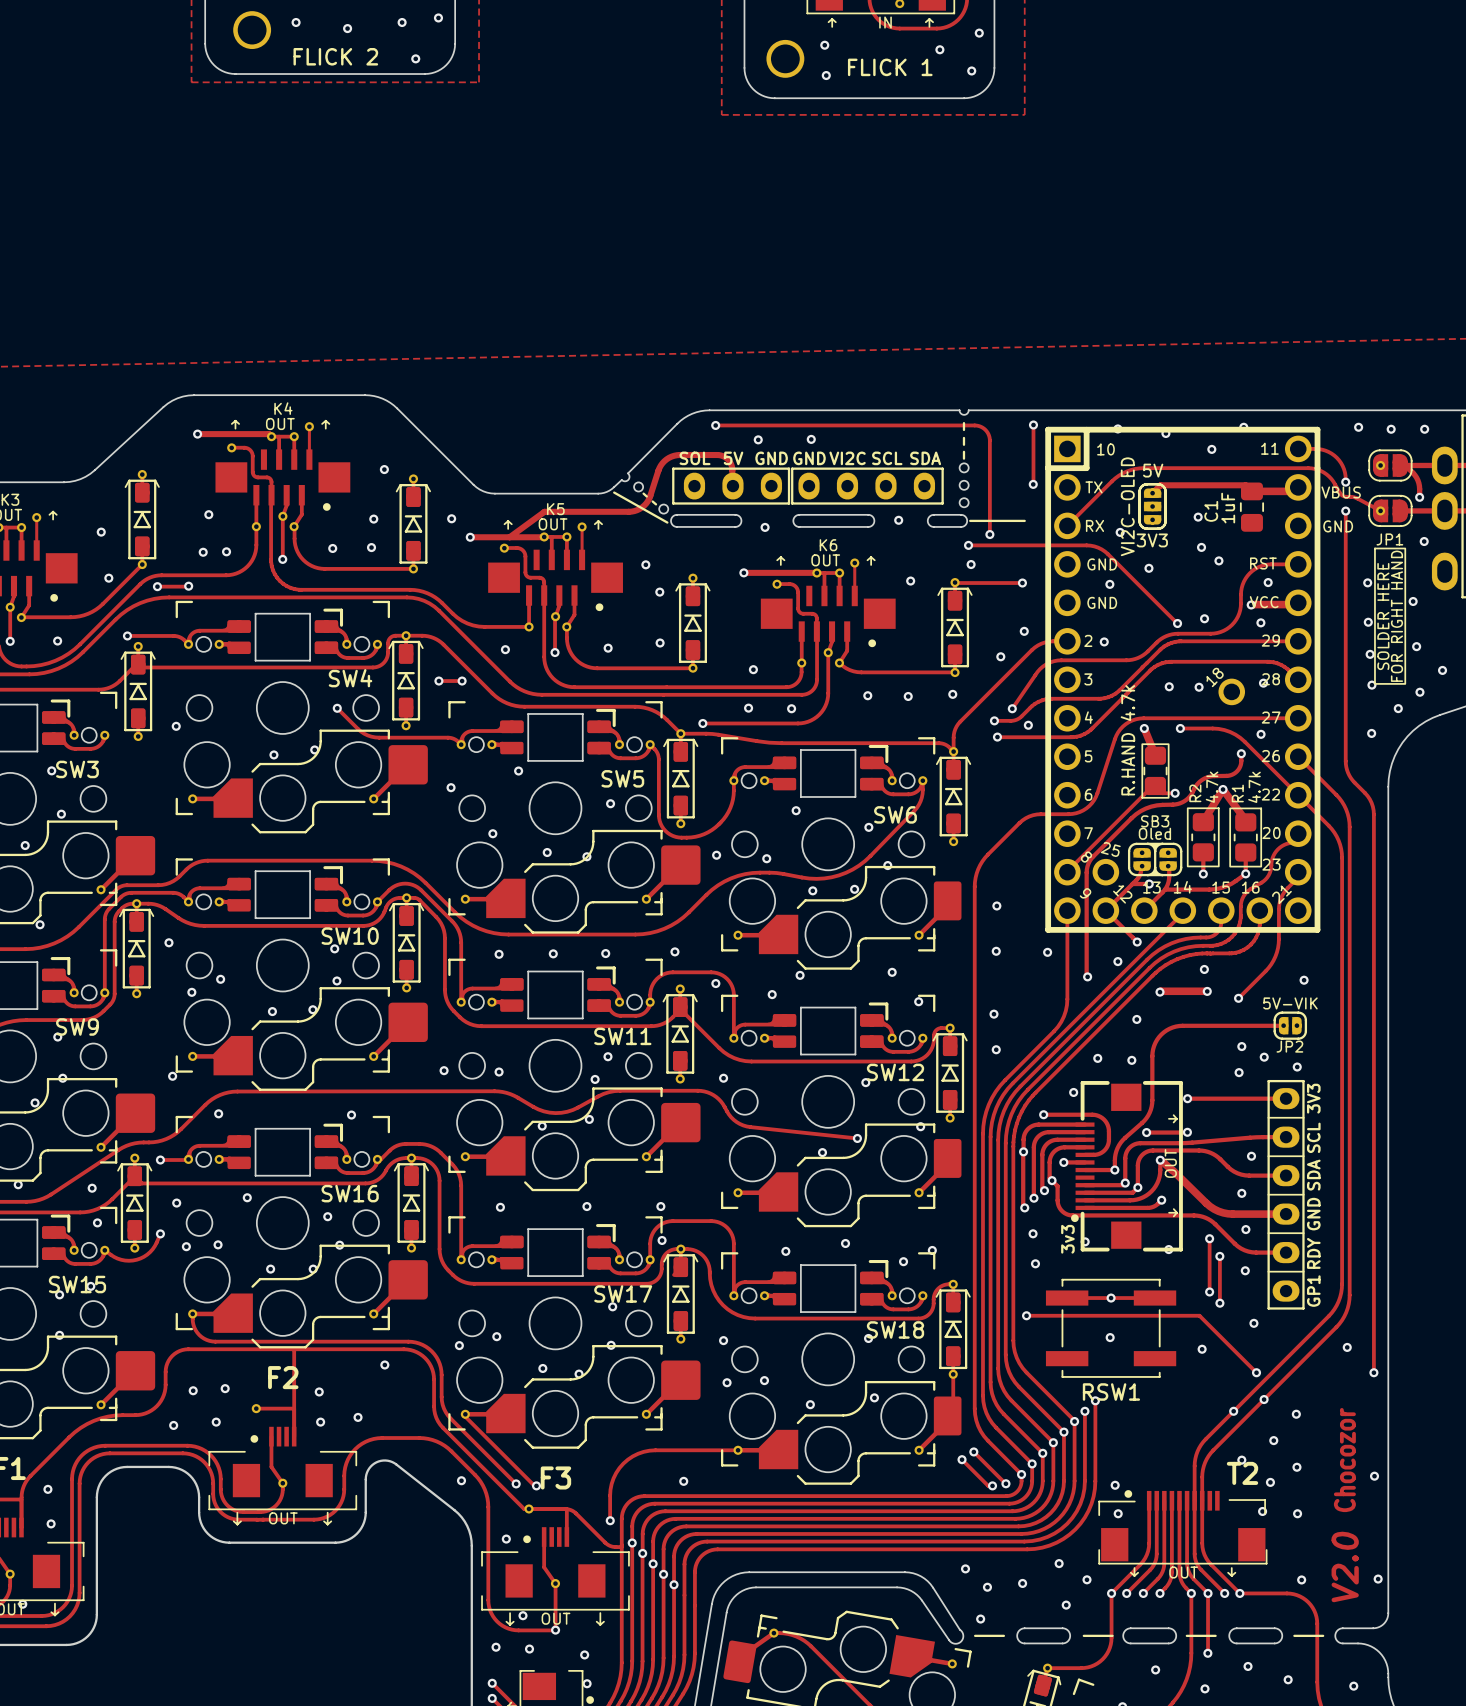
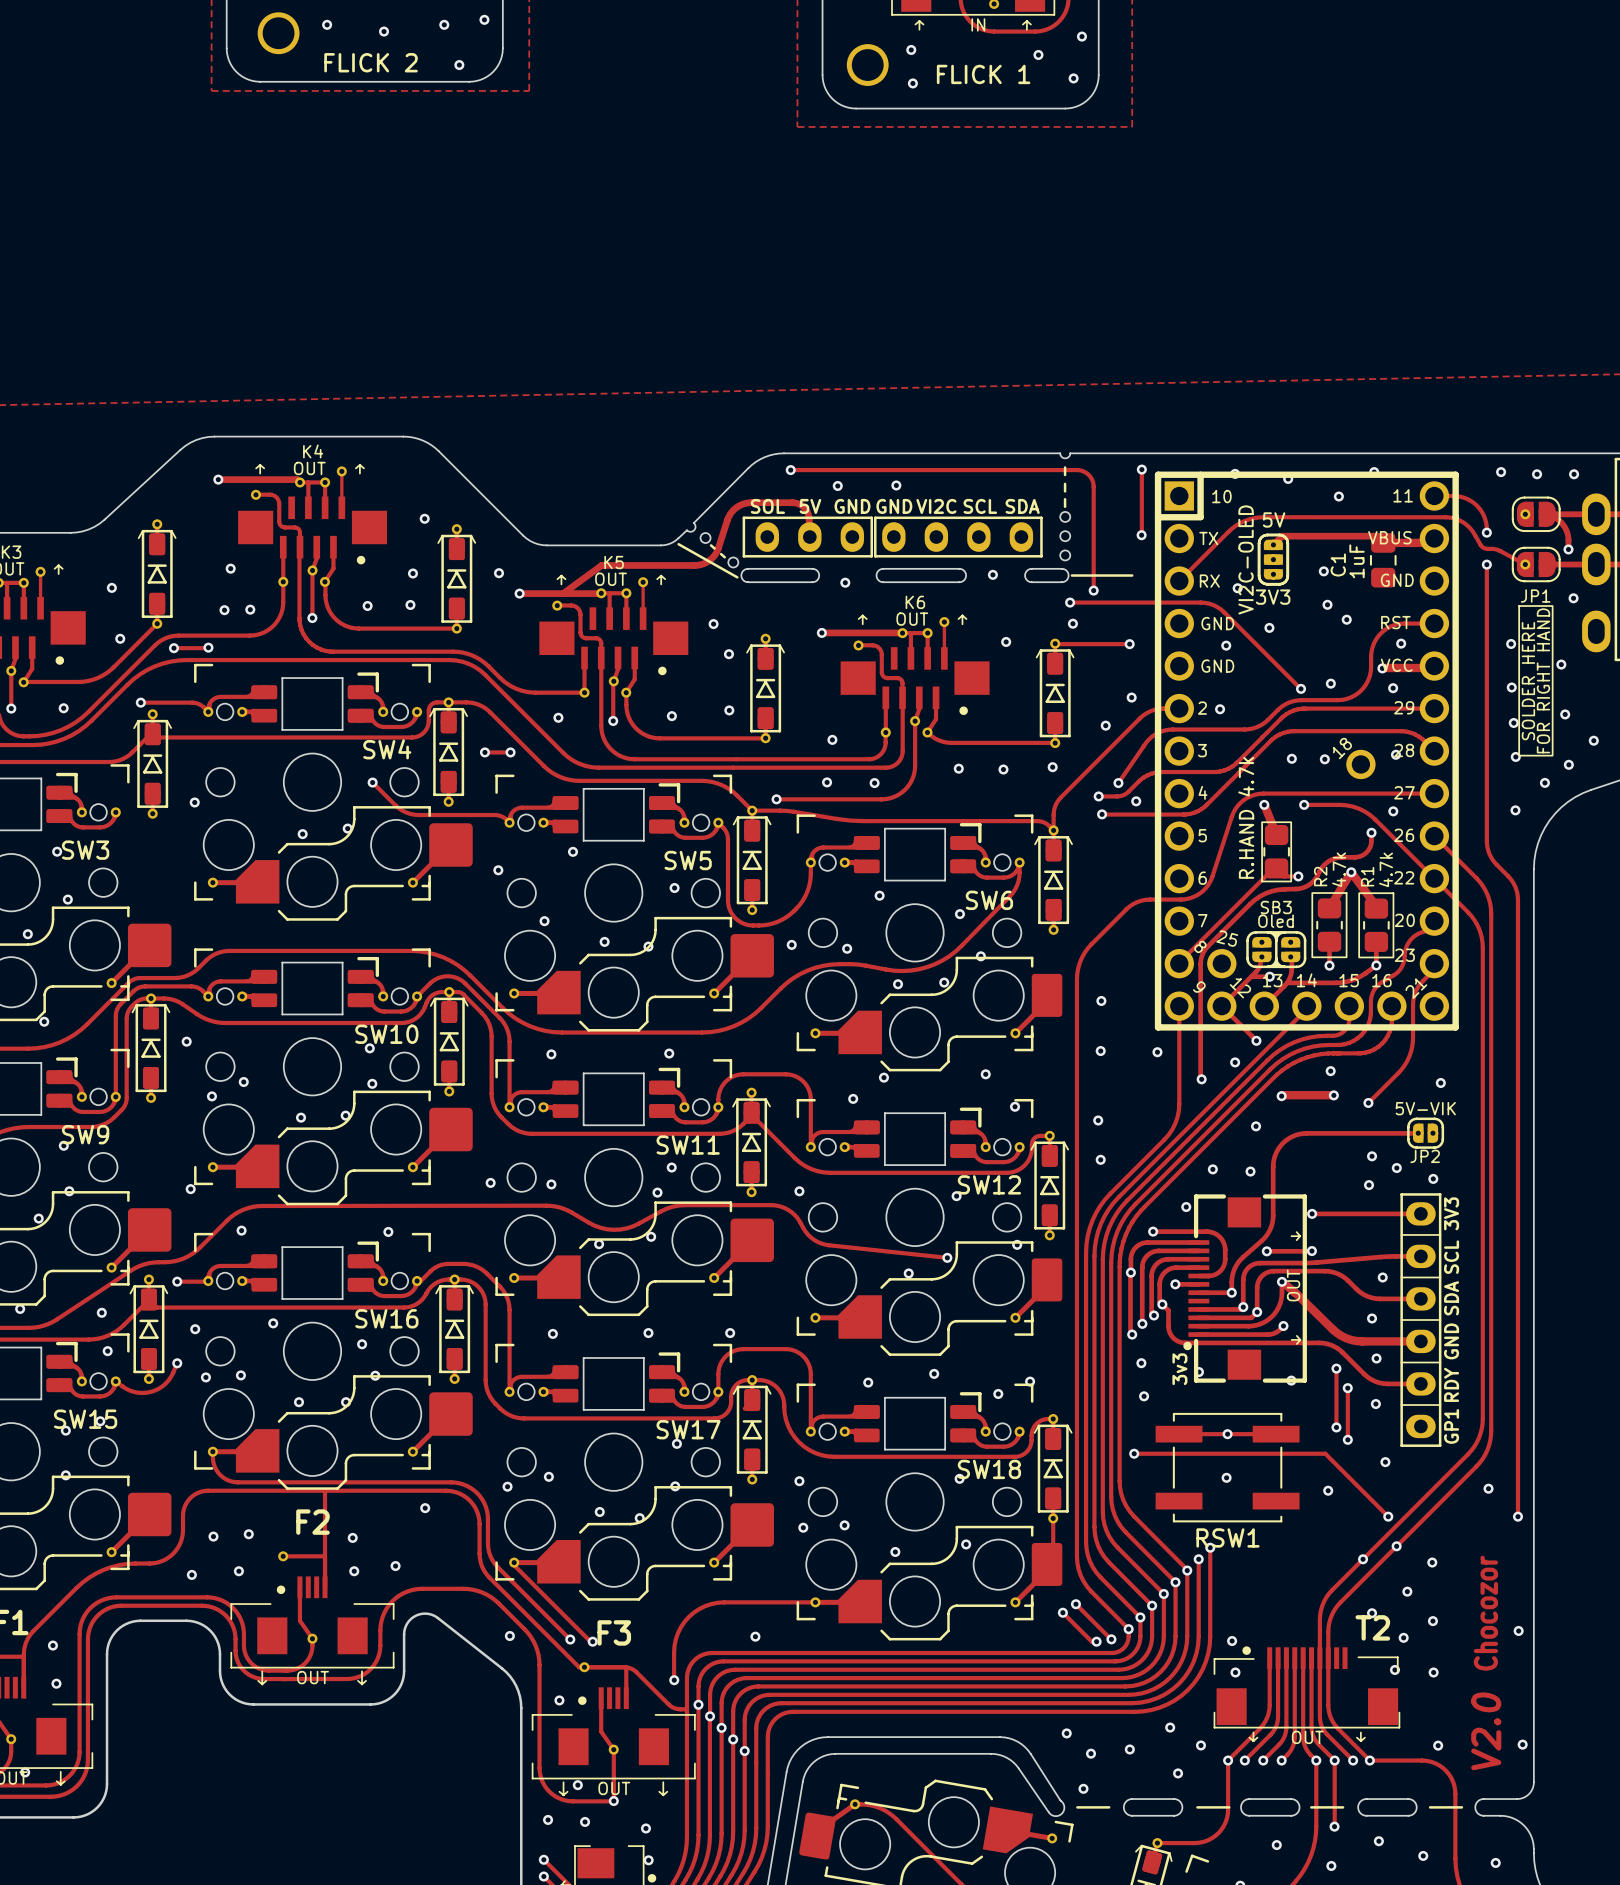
part text position: VBUS (1341, 492) -> VBUS (1389, 537)
part text position: GND (1338, 526) -> GND (1397, 580)
via: (674, 951) -> none
via: (553, 953) -> none
via: (715, 983) -> none
via: (662, 1240) -> none

